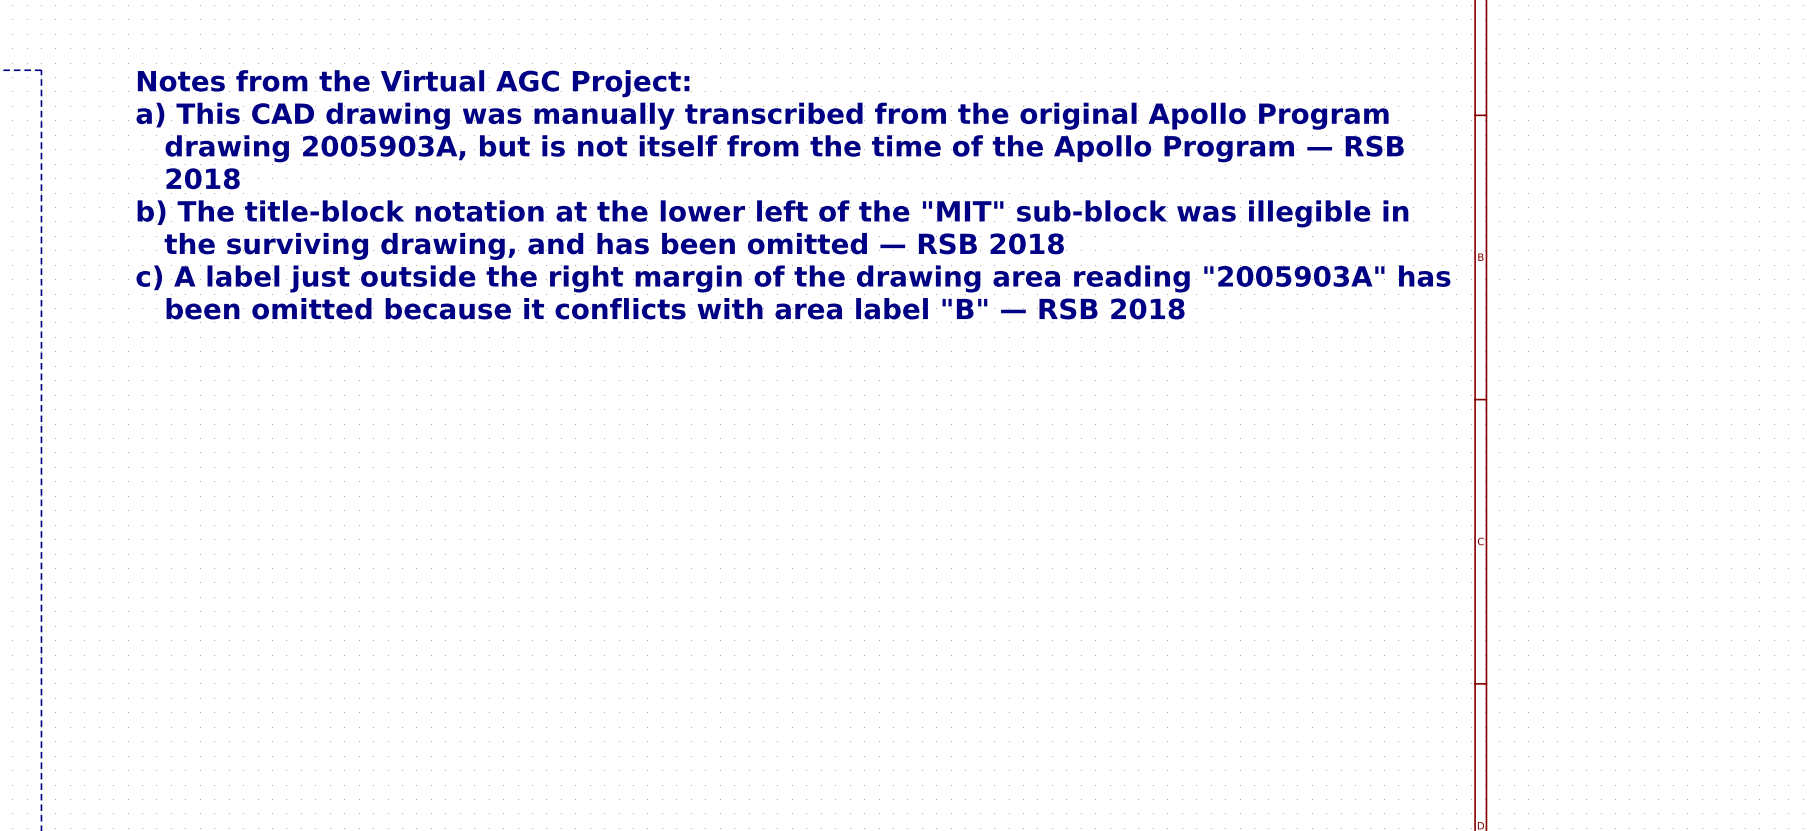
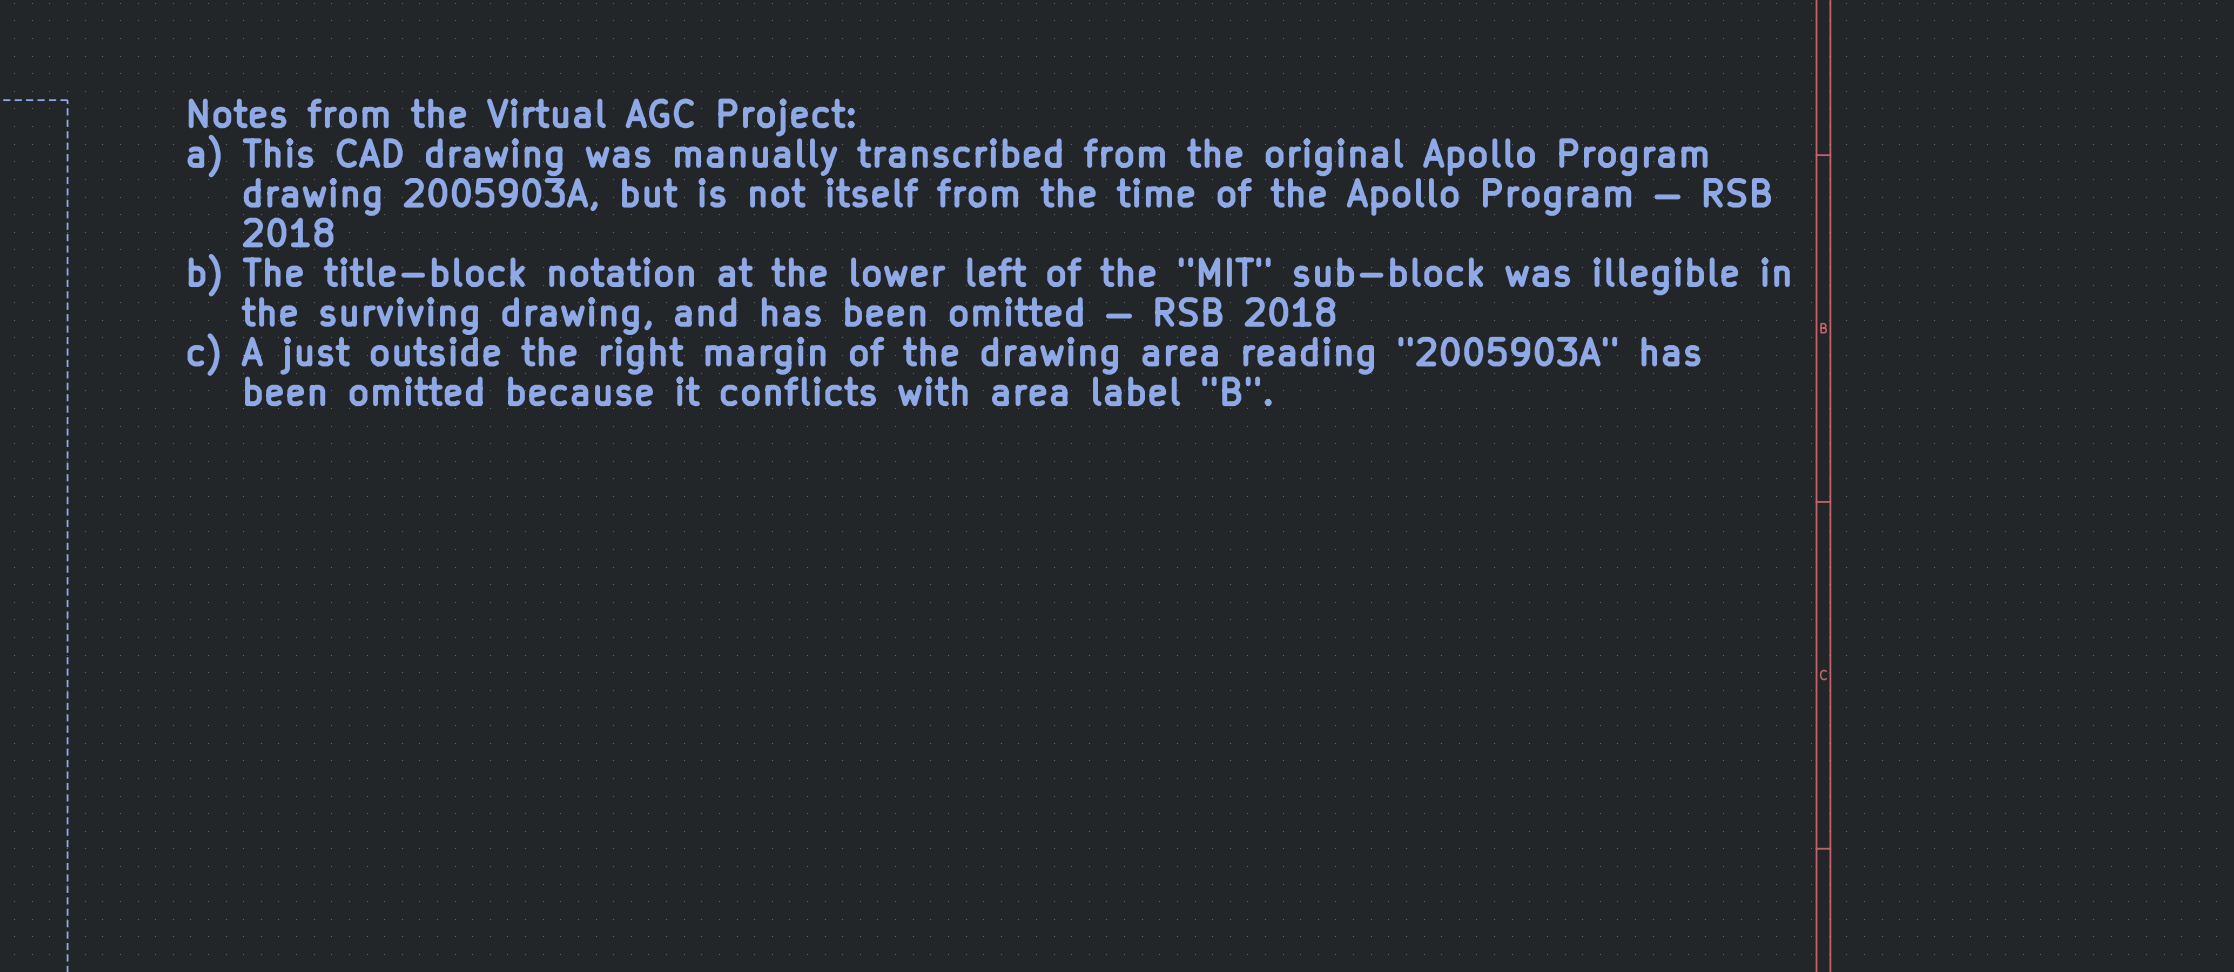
text: c) A label just outside the right margin of the drawing area reading "2005903A" has (793, 278) -> c) A just outside the right margin of the drawing area reading "2005903A" has (944, 354)
text: been omitted because it conflicts with area label "B" — RSB 2018 (675, 308) -> been omitted because it conflicts with area label "B". (758, 391)

